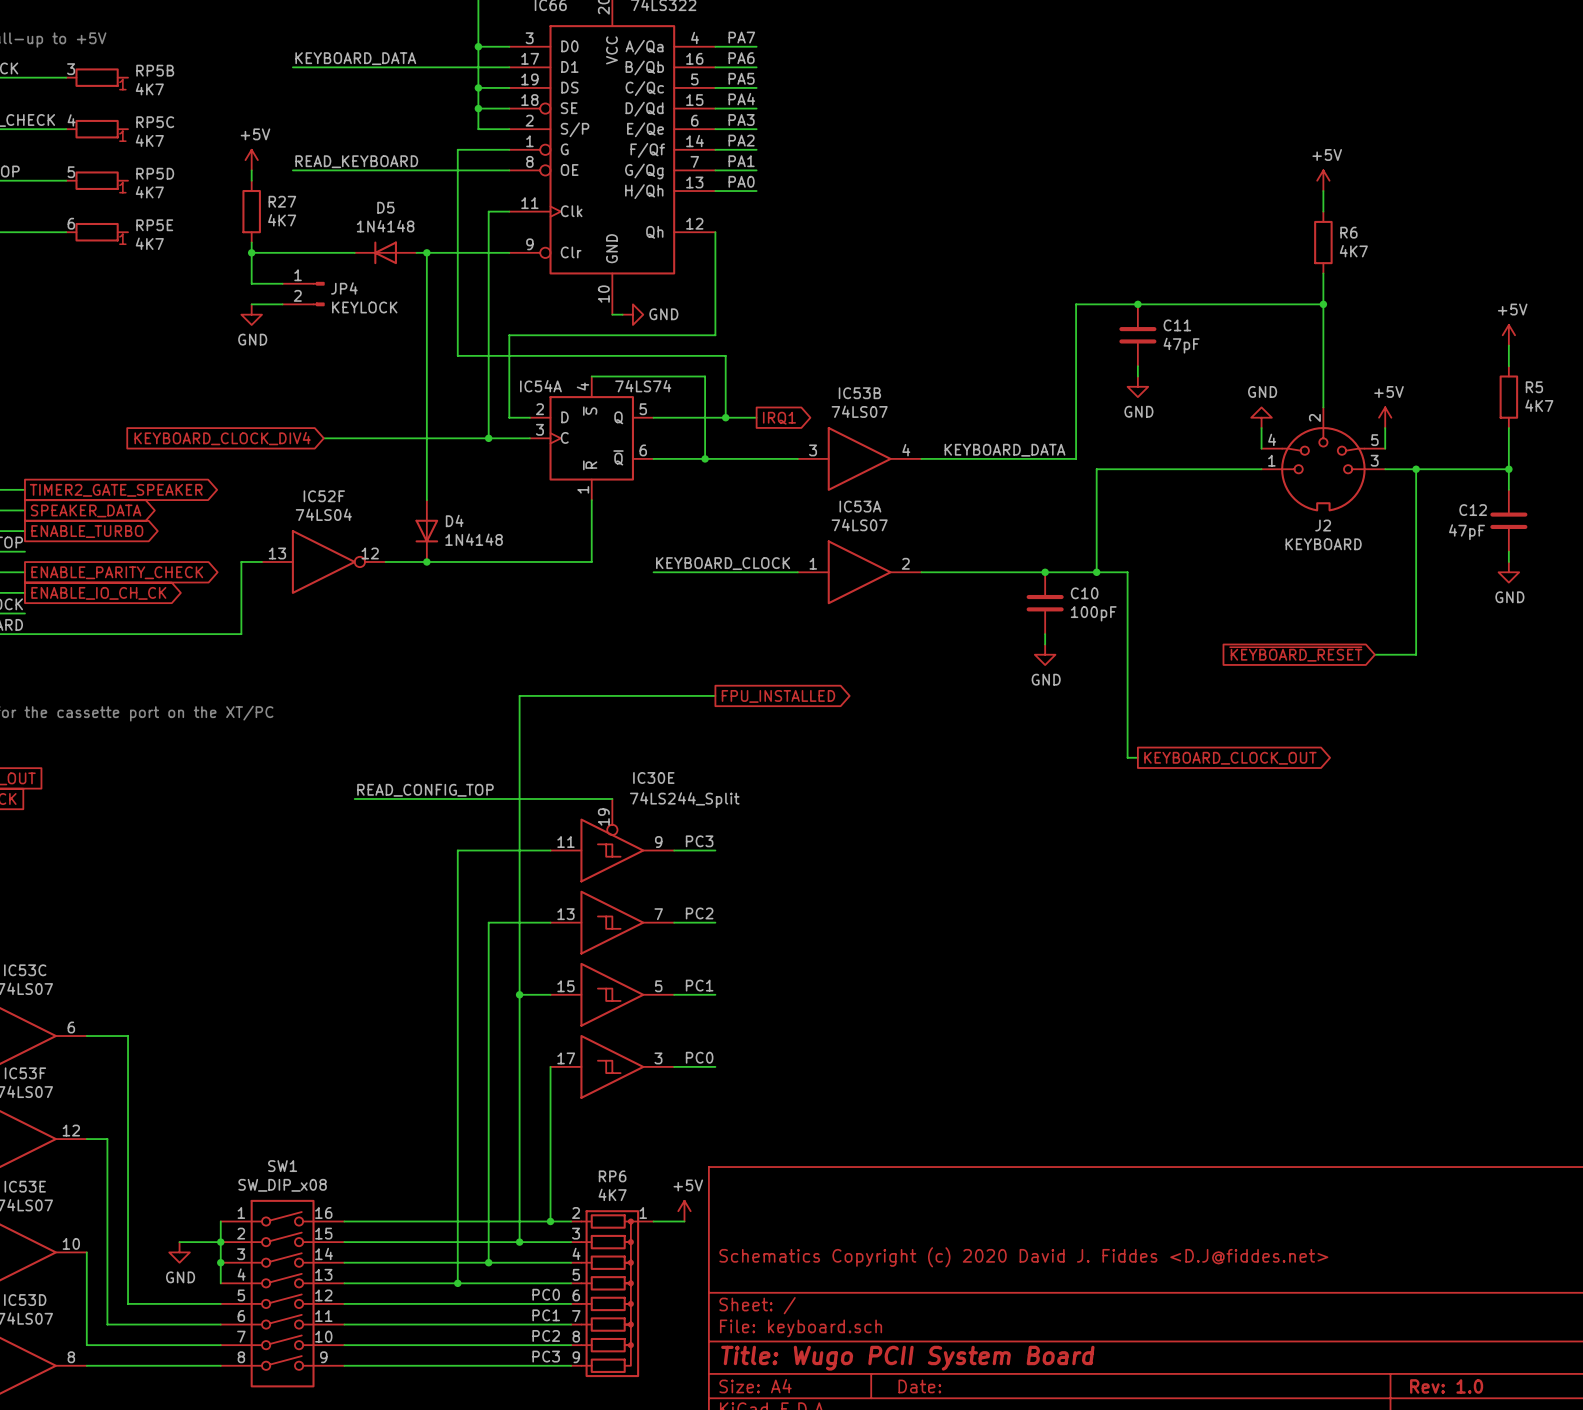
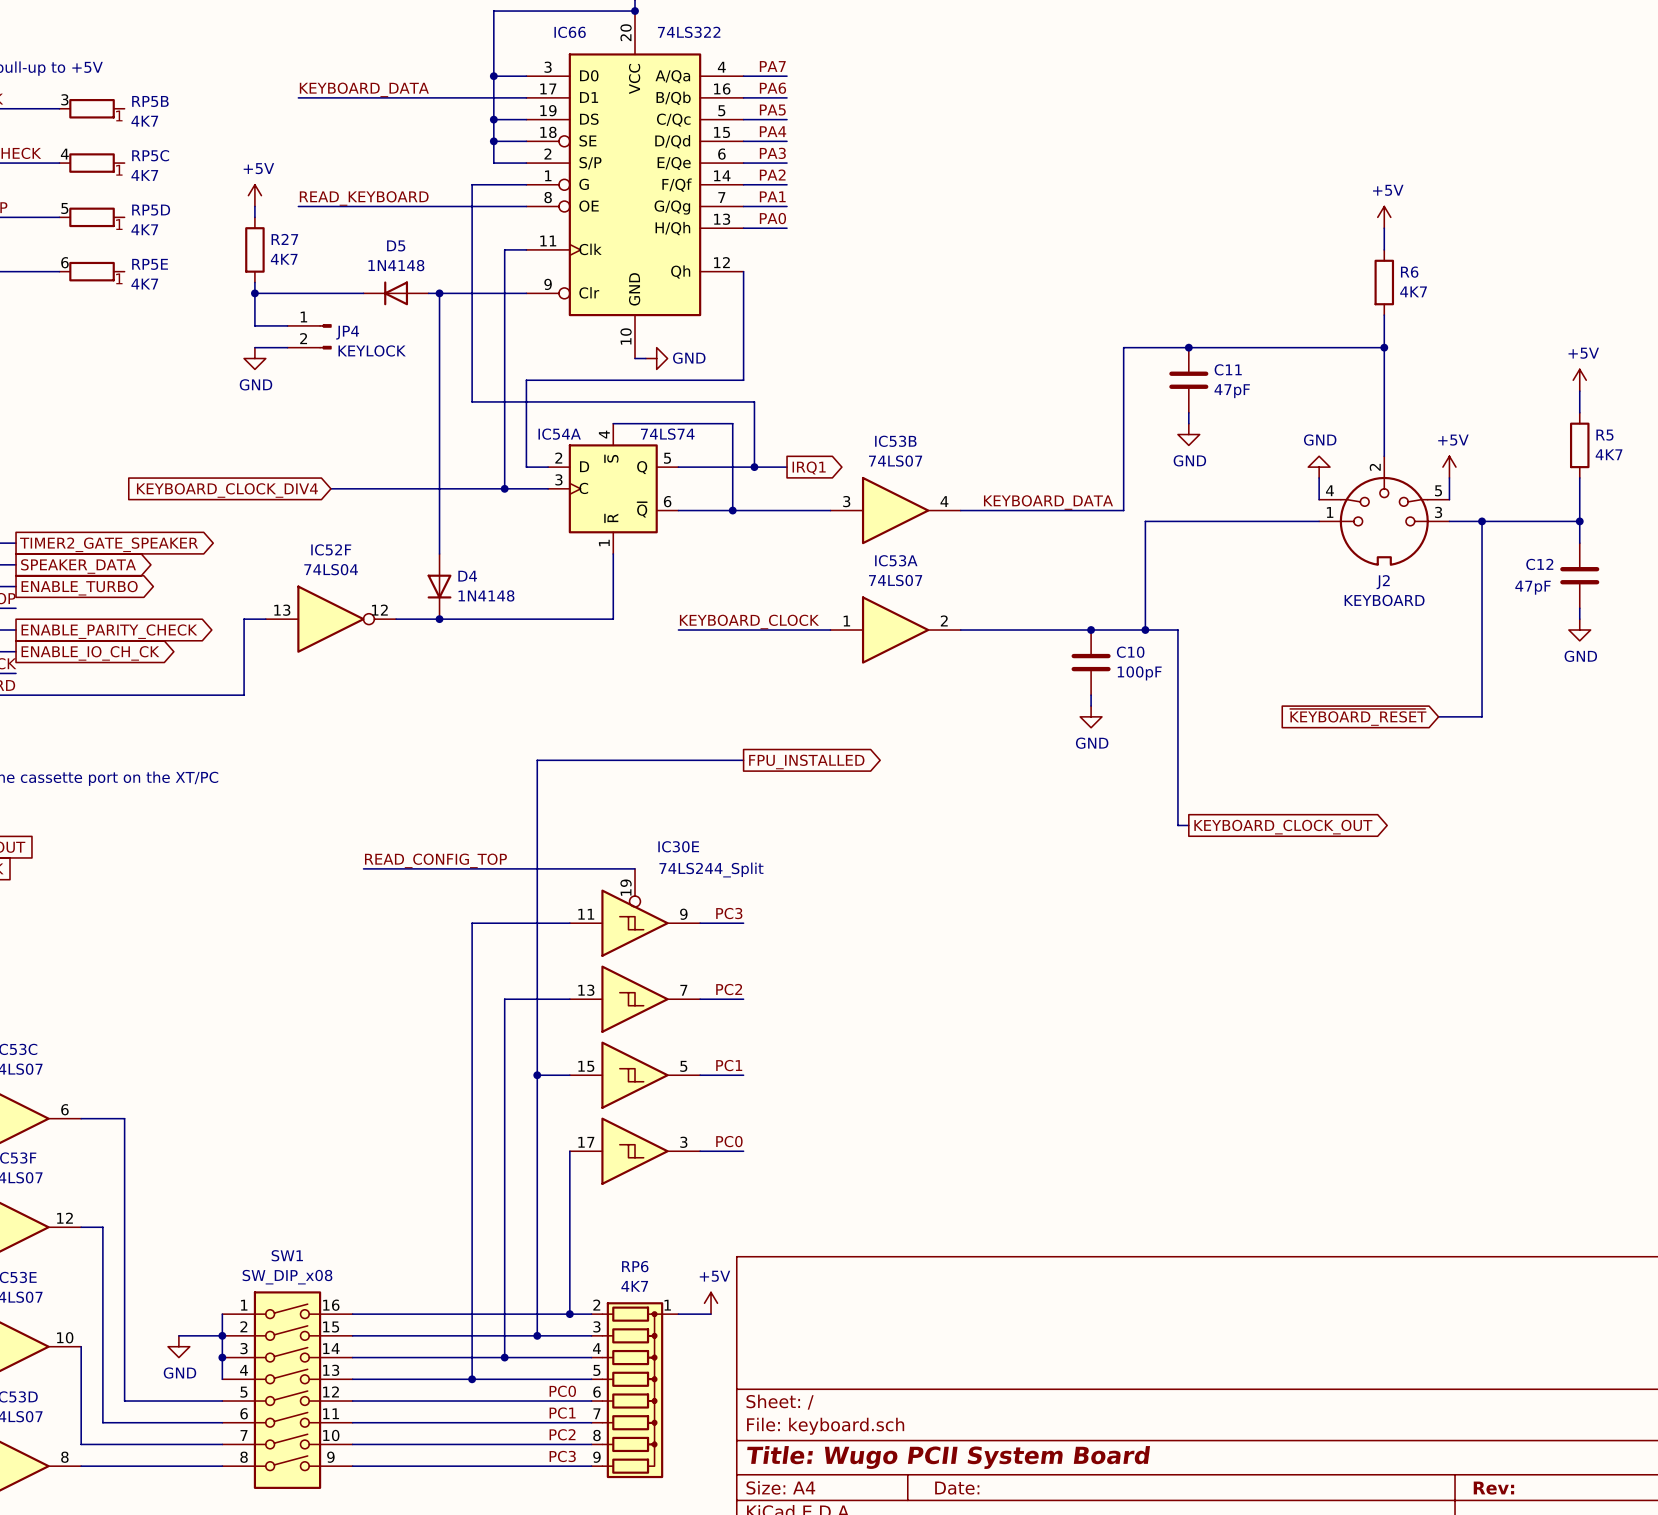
title block: Schematics Copyright (c) 2020 David J. Fiddes <D.J@fiddes.net> (1023, 1257) -> none
title block: Rev: 1.0 (1446, 1386) -> Rev: (1493, 1488)

